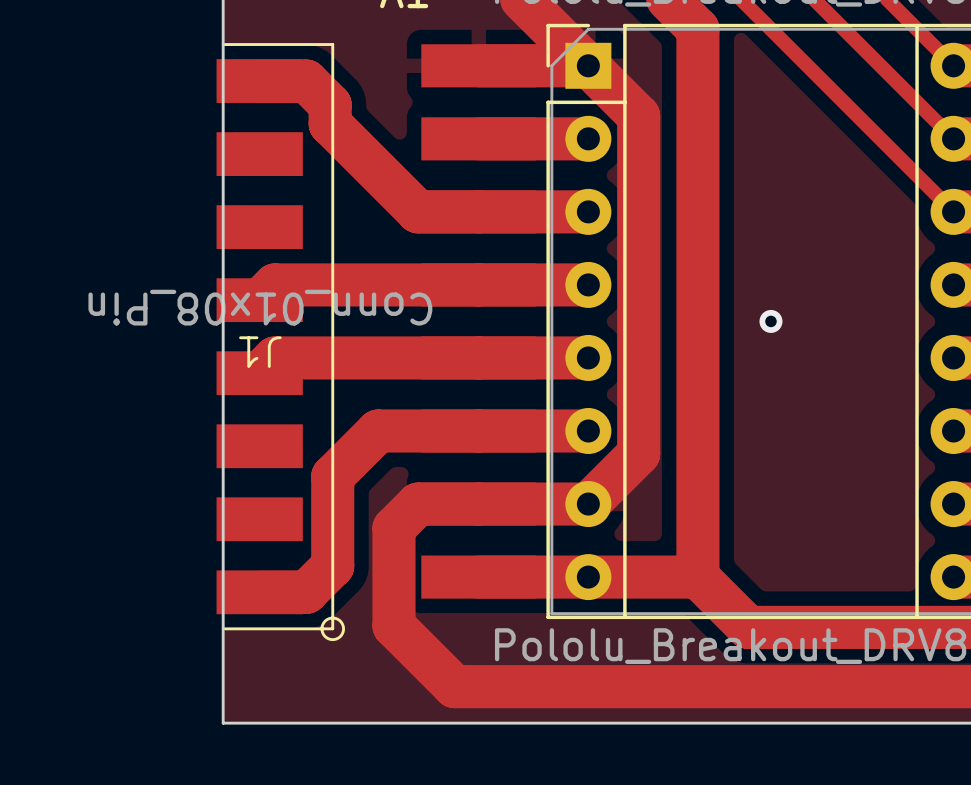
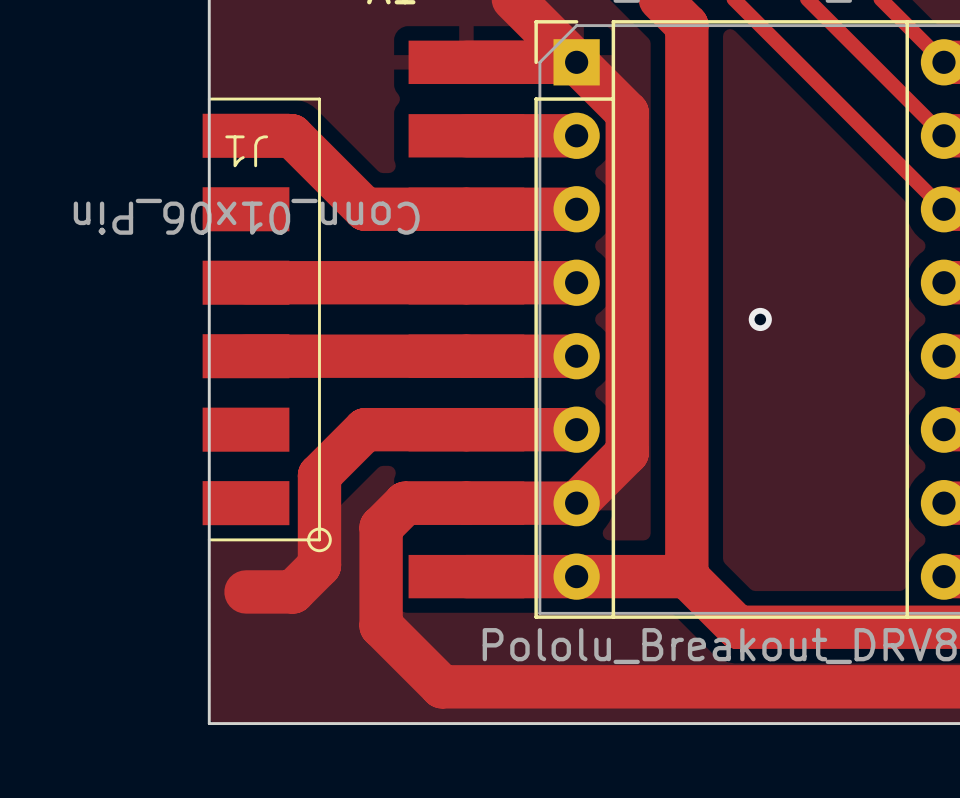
J1 footprint: [216, 43, 345, 642] -> [202, 97, 332, 553]
track: (259, 81) (306, 81) (330, 104) (330, 123) (418, 211) -> (246, 135) (291, 135) (365, 209) (405, 209)
J1 value: Conn_01x08_Pin (260, 307) -> Conn_01x06_Pin (246, 216)
J1 name position: J1 (260, 352) -> J1 (246, 151)

